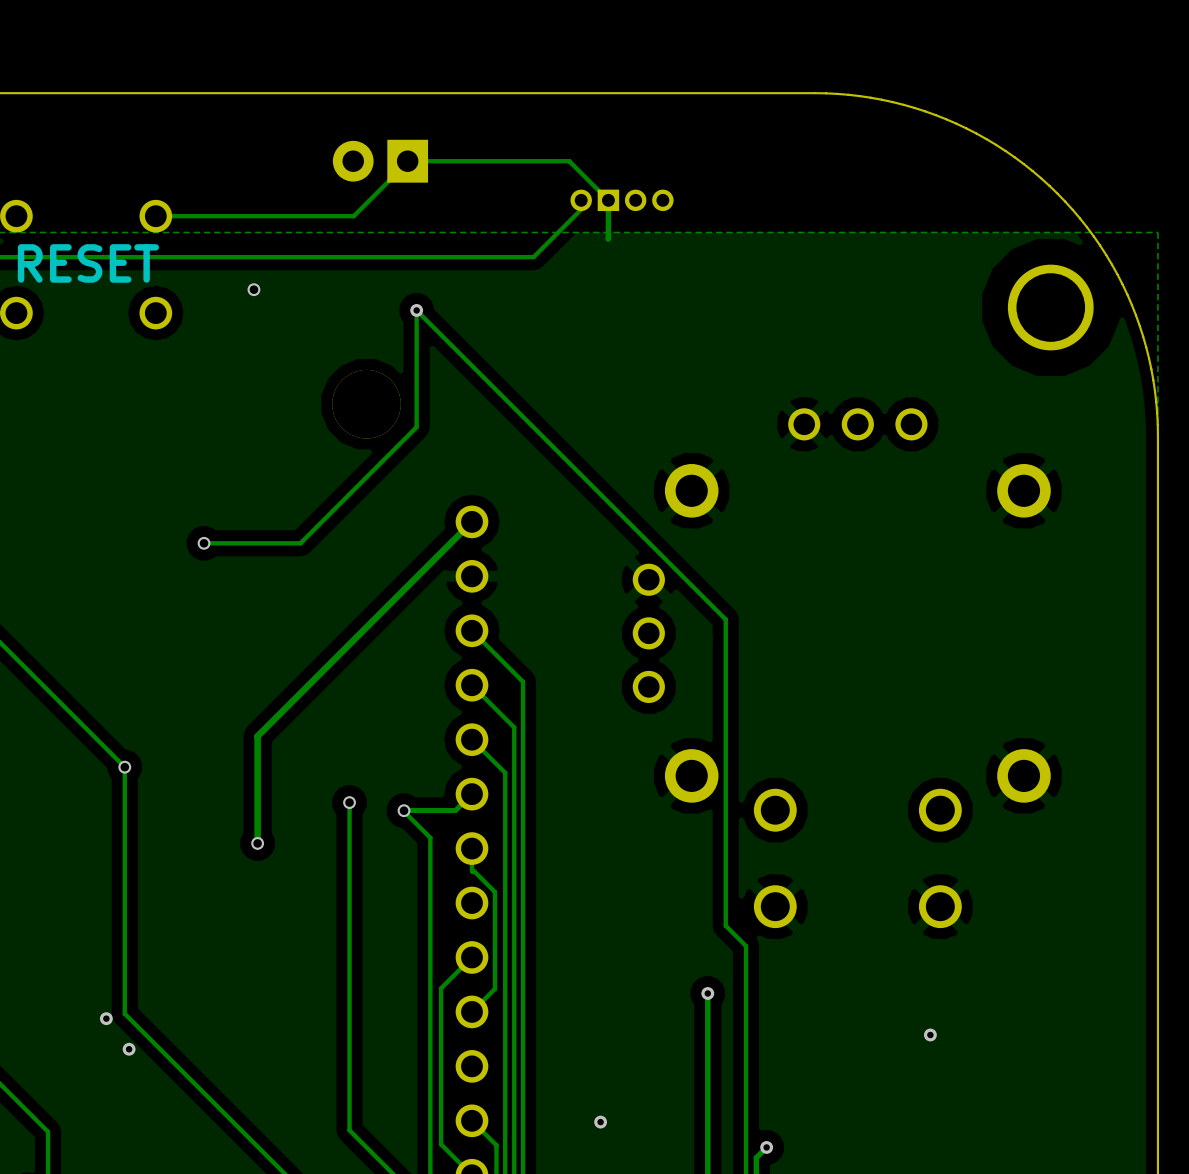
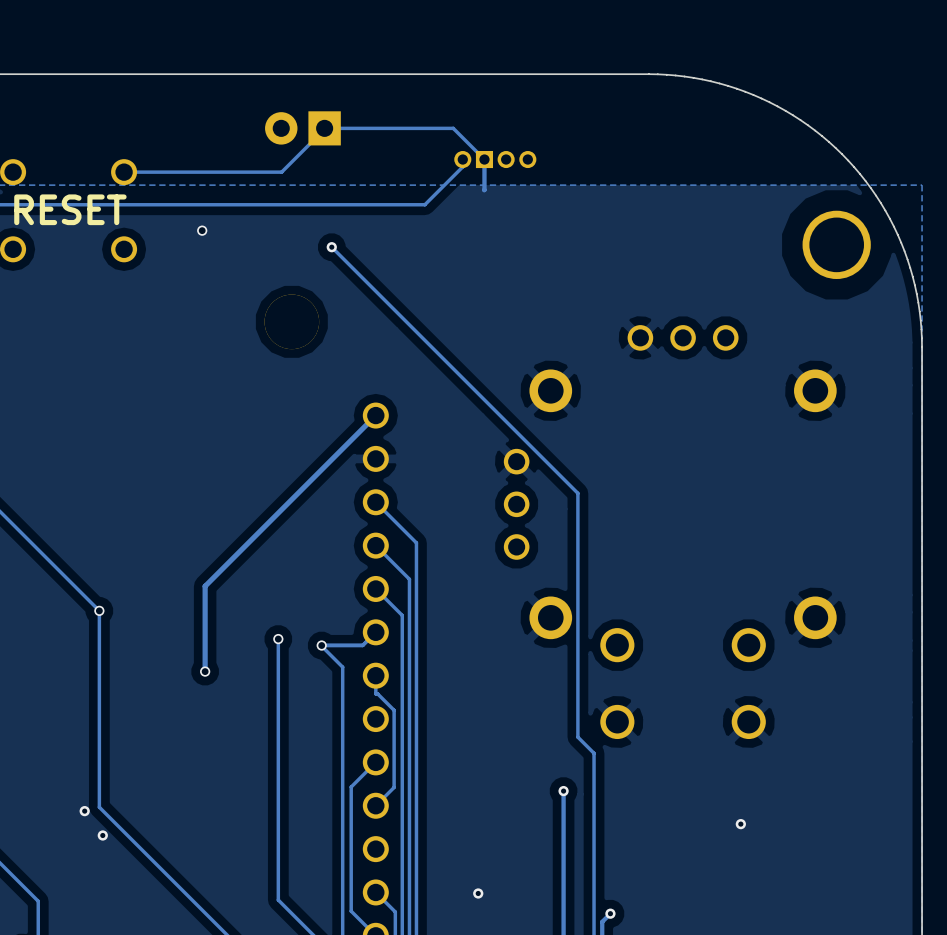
track: (416, 310) (416, 427) (300, 543) (204, 543) -> none
via: (204, 543) -> none

